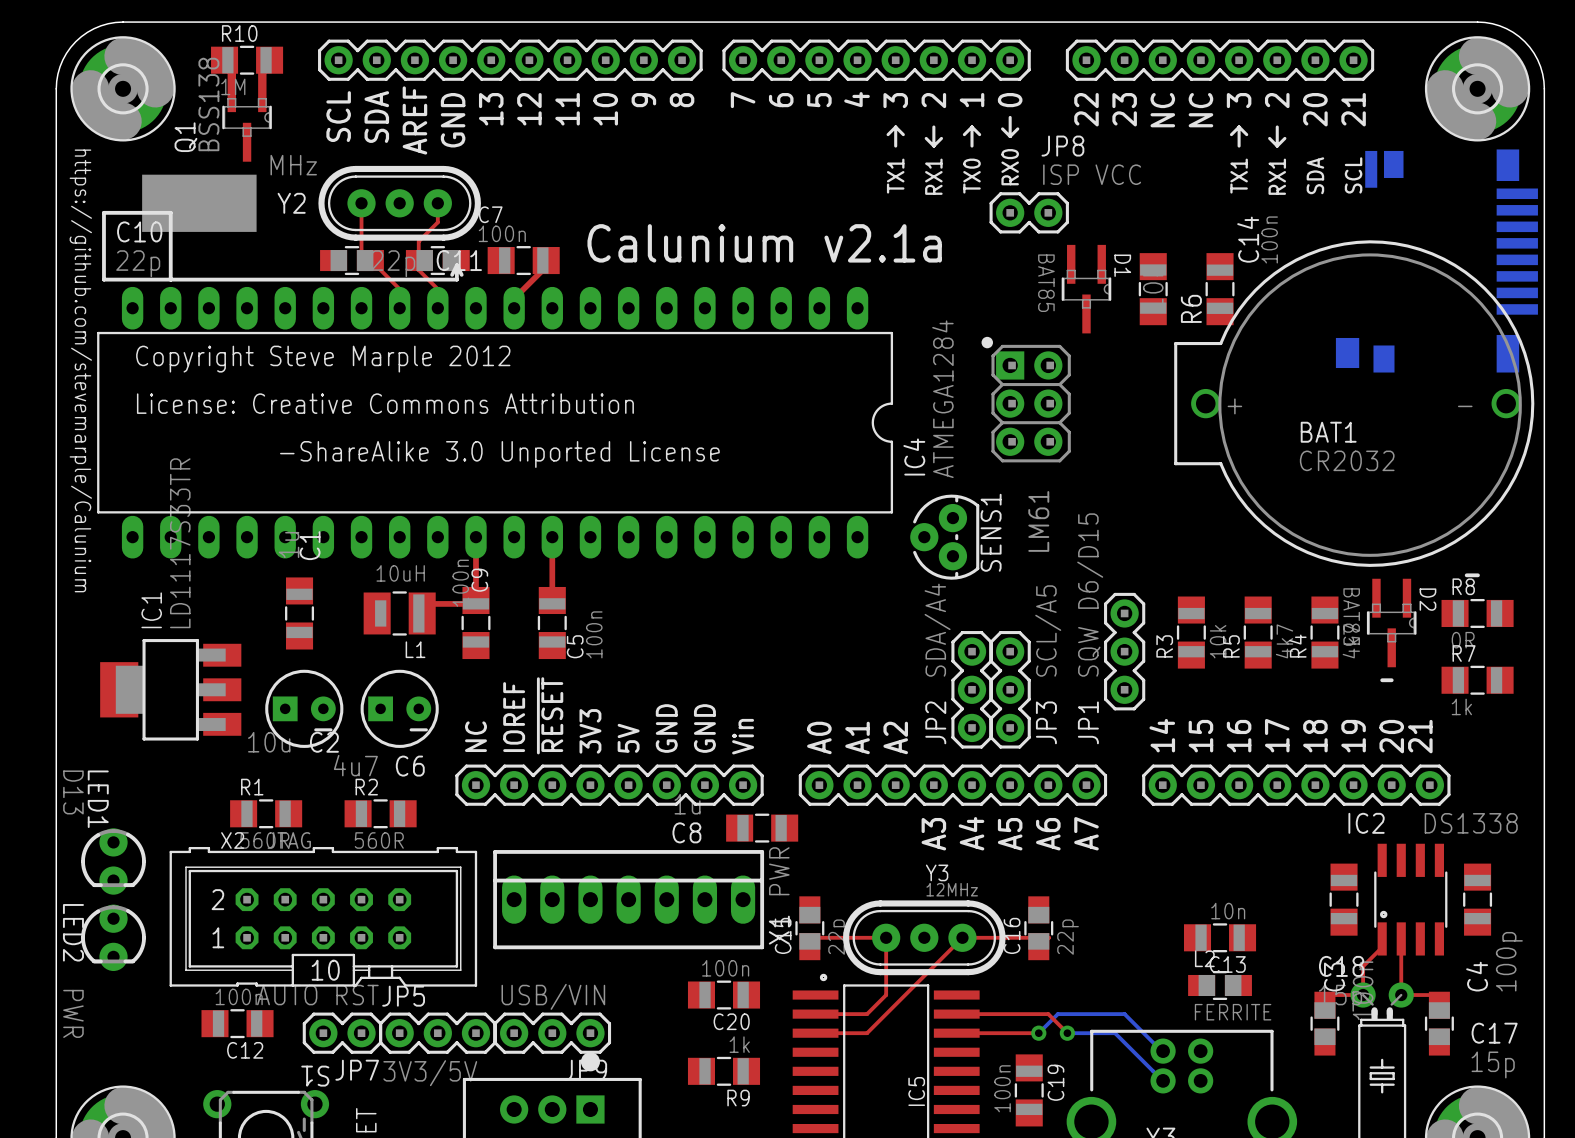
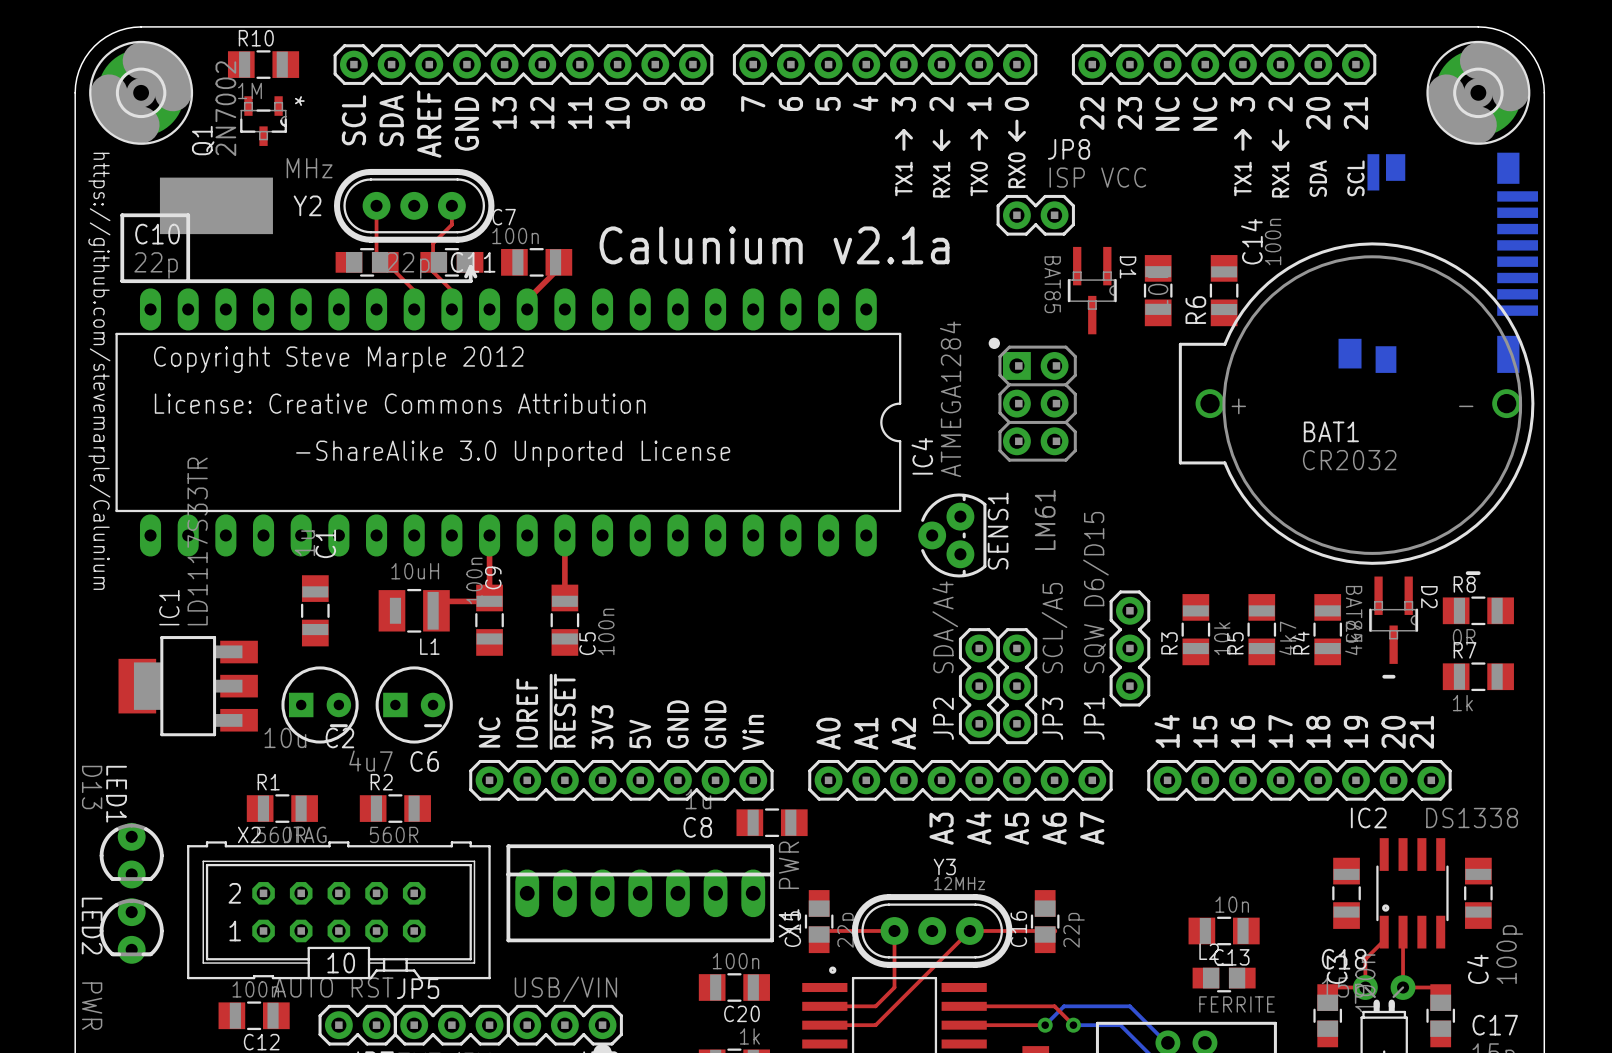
Q1 footprint: [222, 73, 272, 162] -> [240, 96, 287, 146]
Q1 value: BSS138 (208, 104) -> 2N7002 (225, 108)

